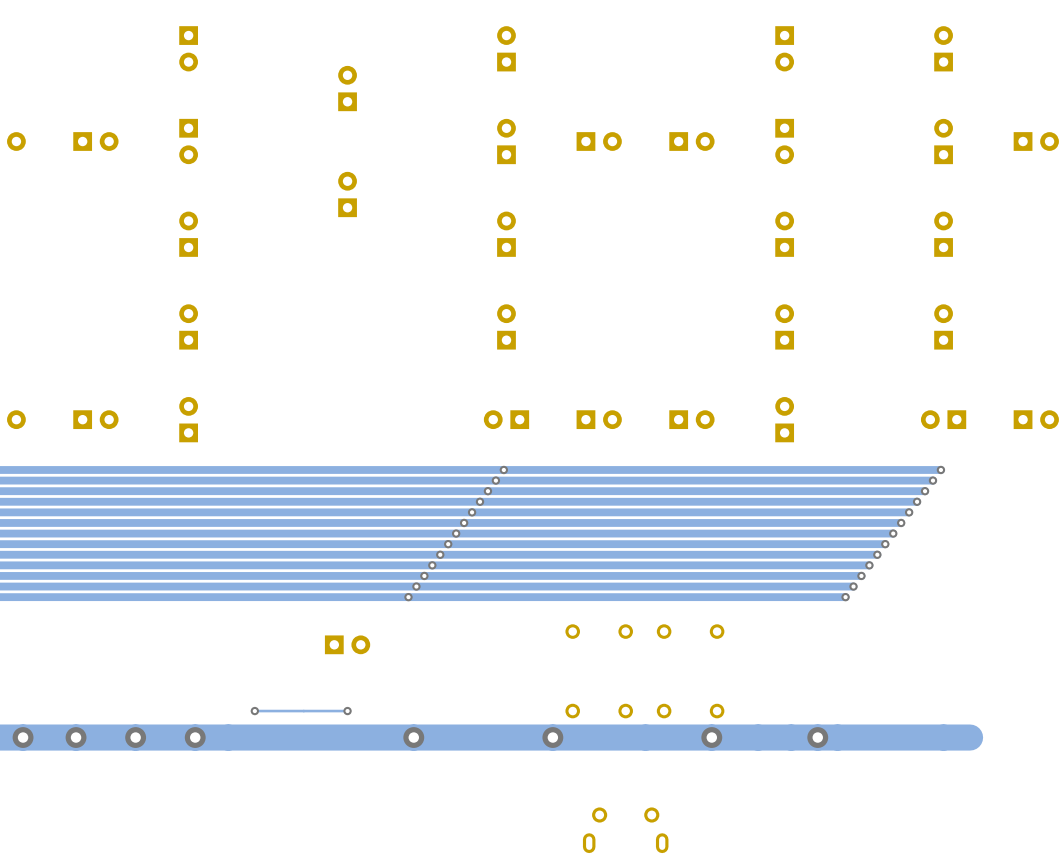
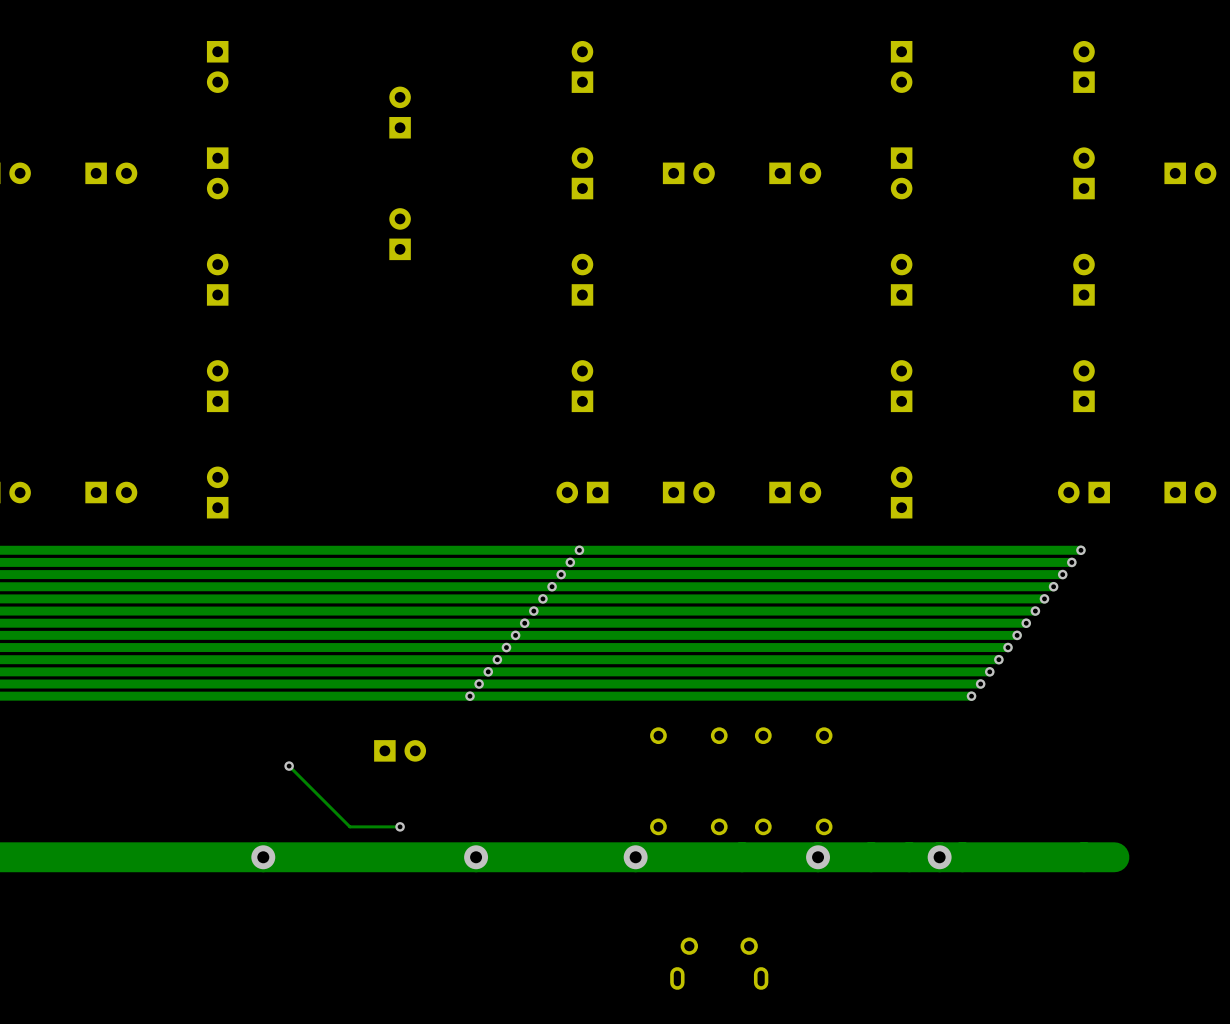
via position: (254, 711) -> (289, 766)
track: (303, 711) (254, 711) -> (349, 826) (289, 766)
via: (23, 737) -> none
via: (76, 737) -> none
via: (135, 737) -> none
via position: (195, 737) -> (263, 857)

